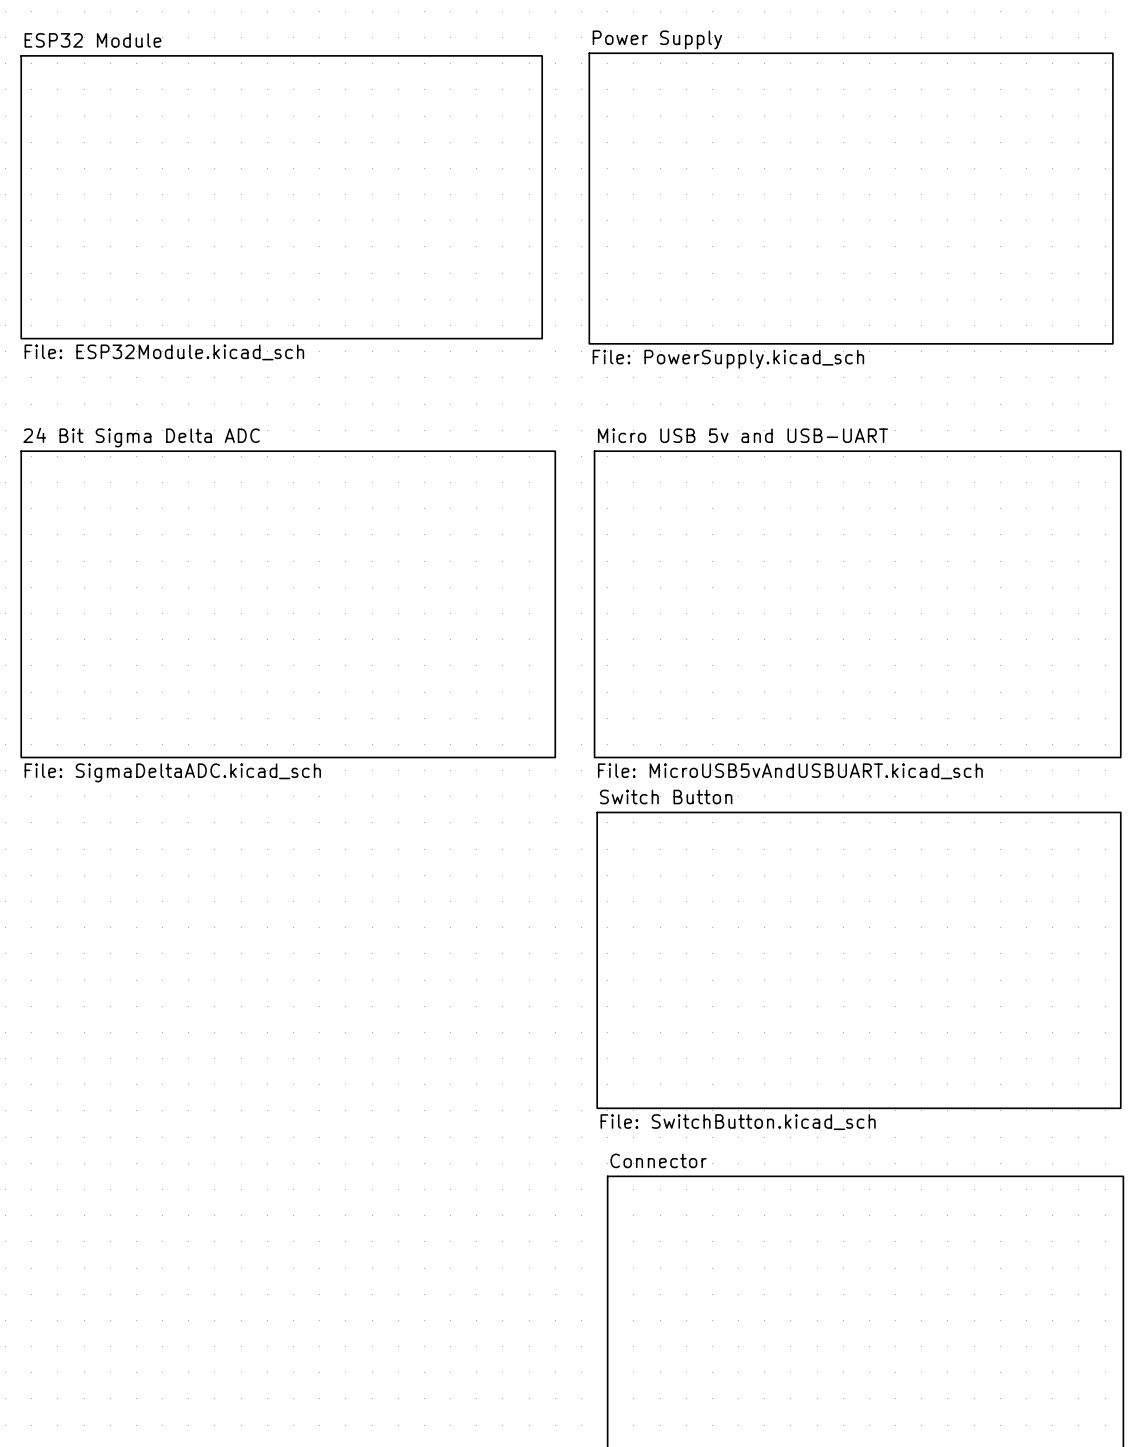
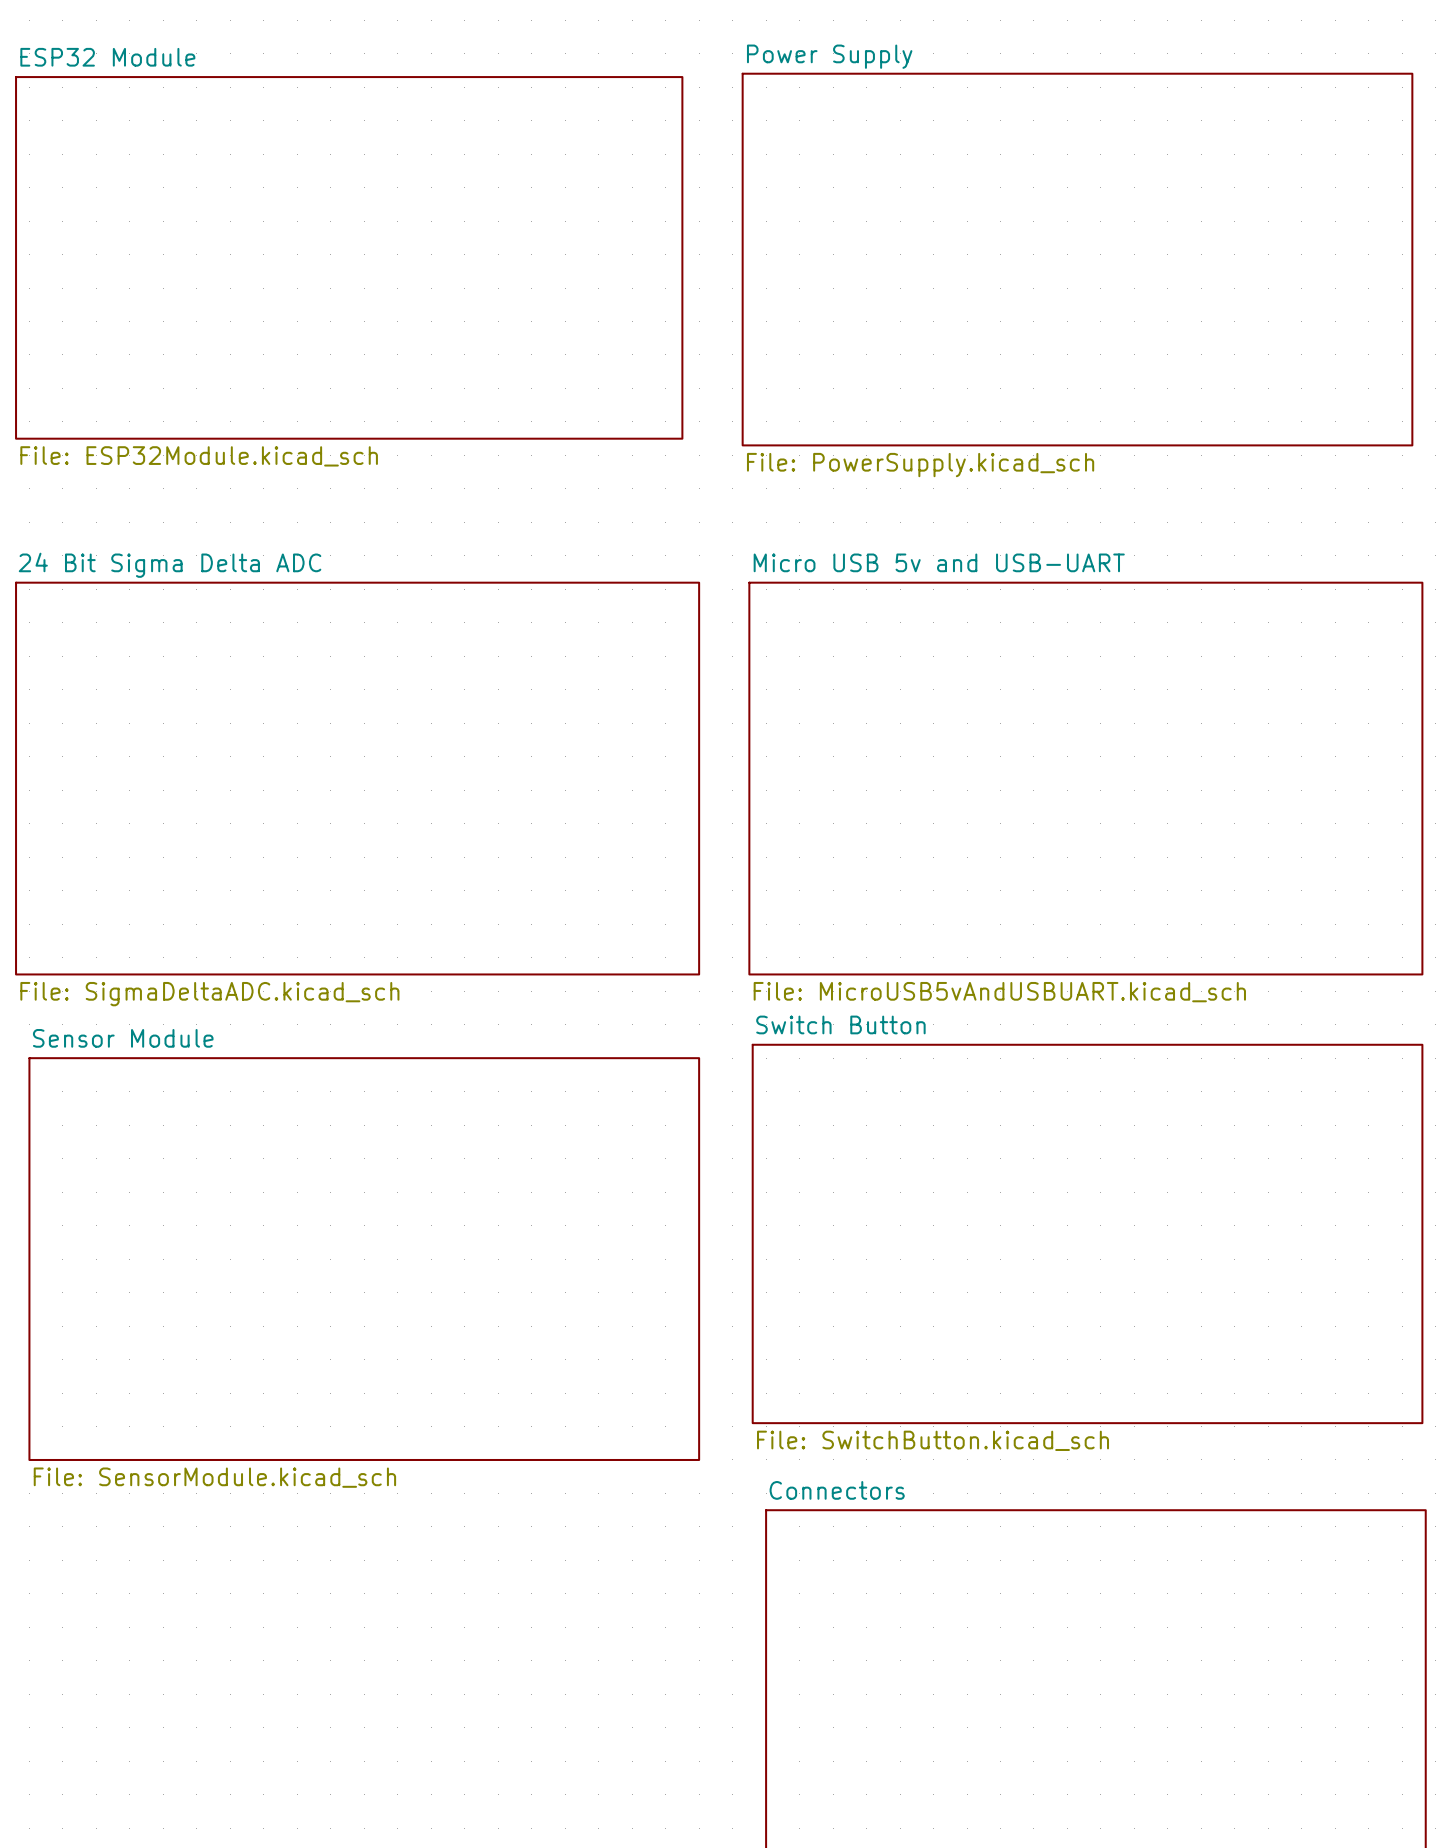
sheet Sensor Module: none -> File: SensorModule.kicad_sch (364, 1259)
sheet Connector name: Connector (658, 1160) -> Connectors (837, 1490)

